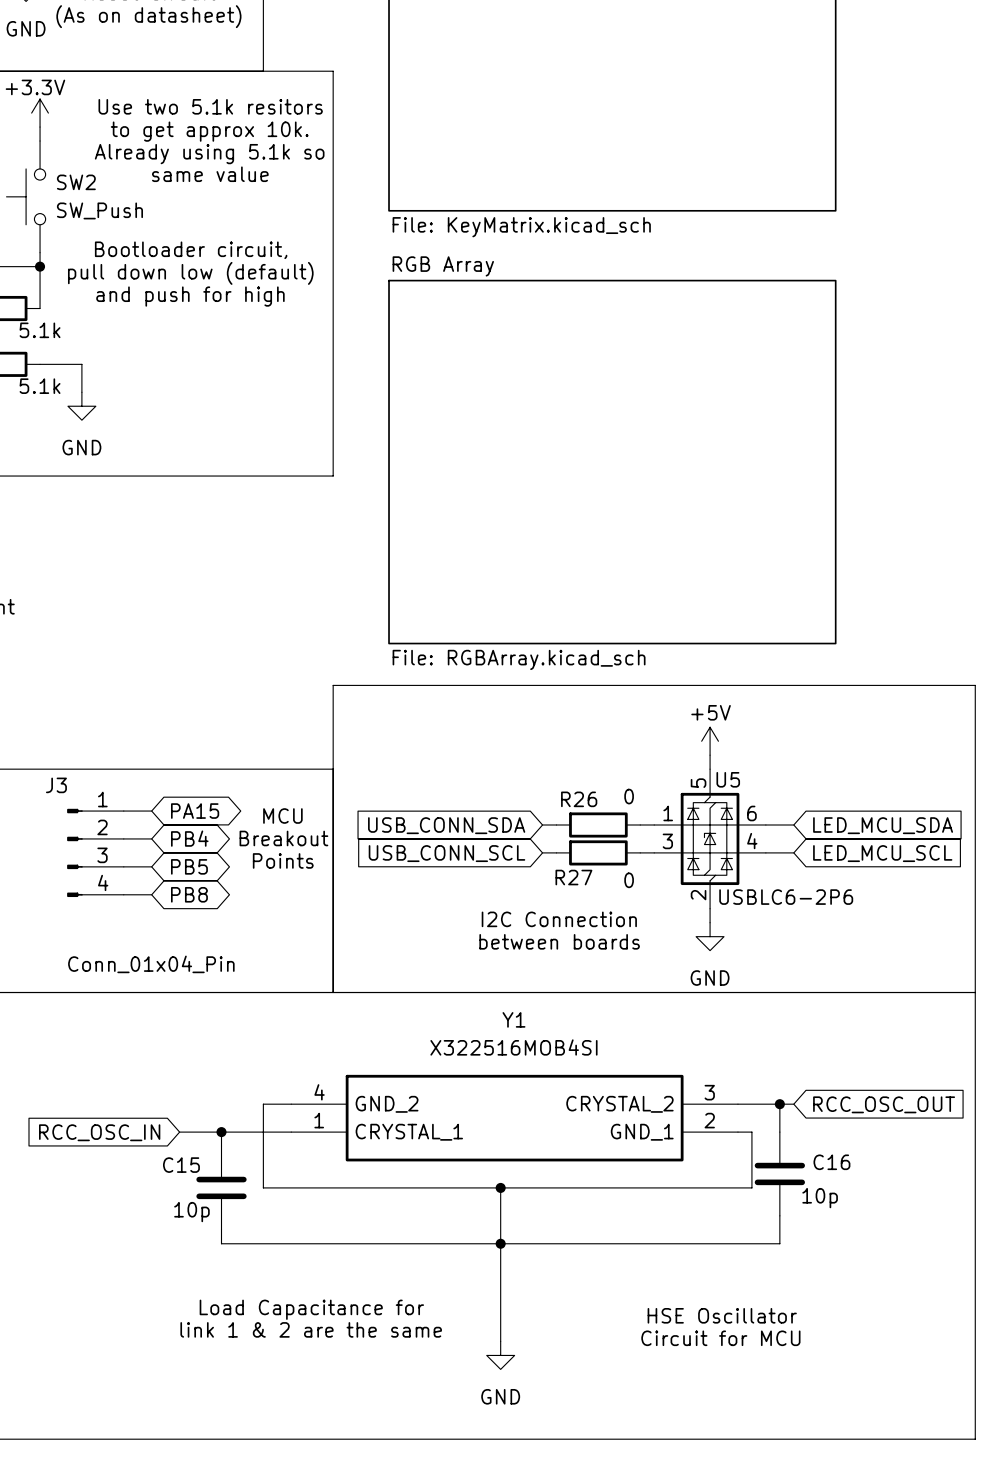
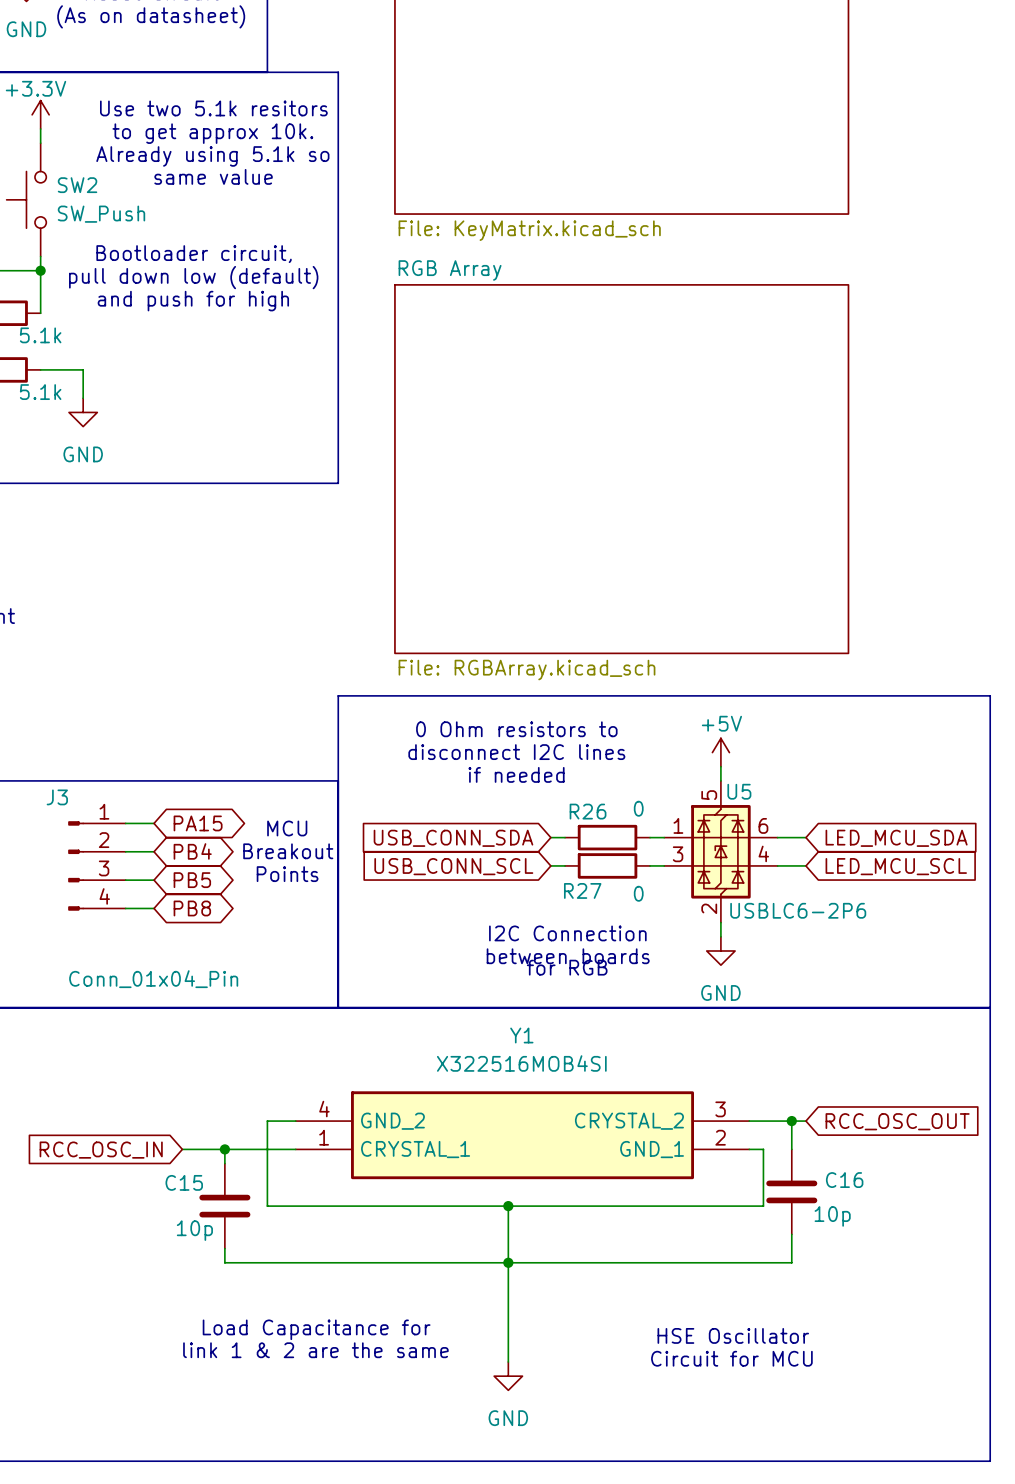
text: none -> 0 Ohm resistors to (516, 729)
text: none -> disconnect I2C lines (516, 752)
text: none -> if needed (516, 774)
text: none -> for RGB (567, 967)

